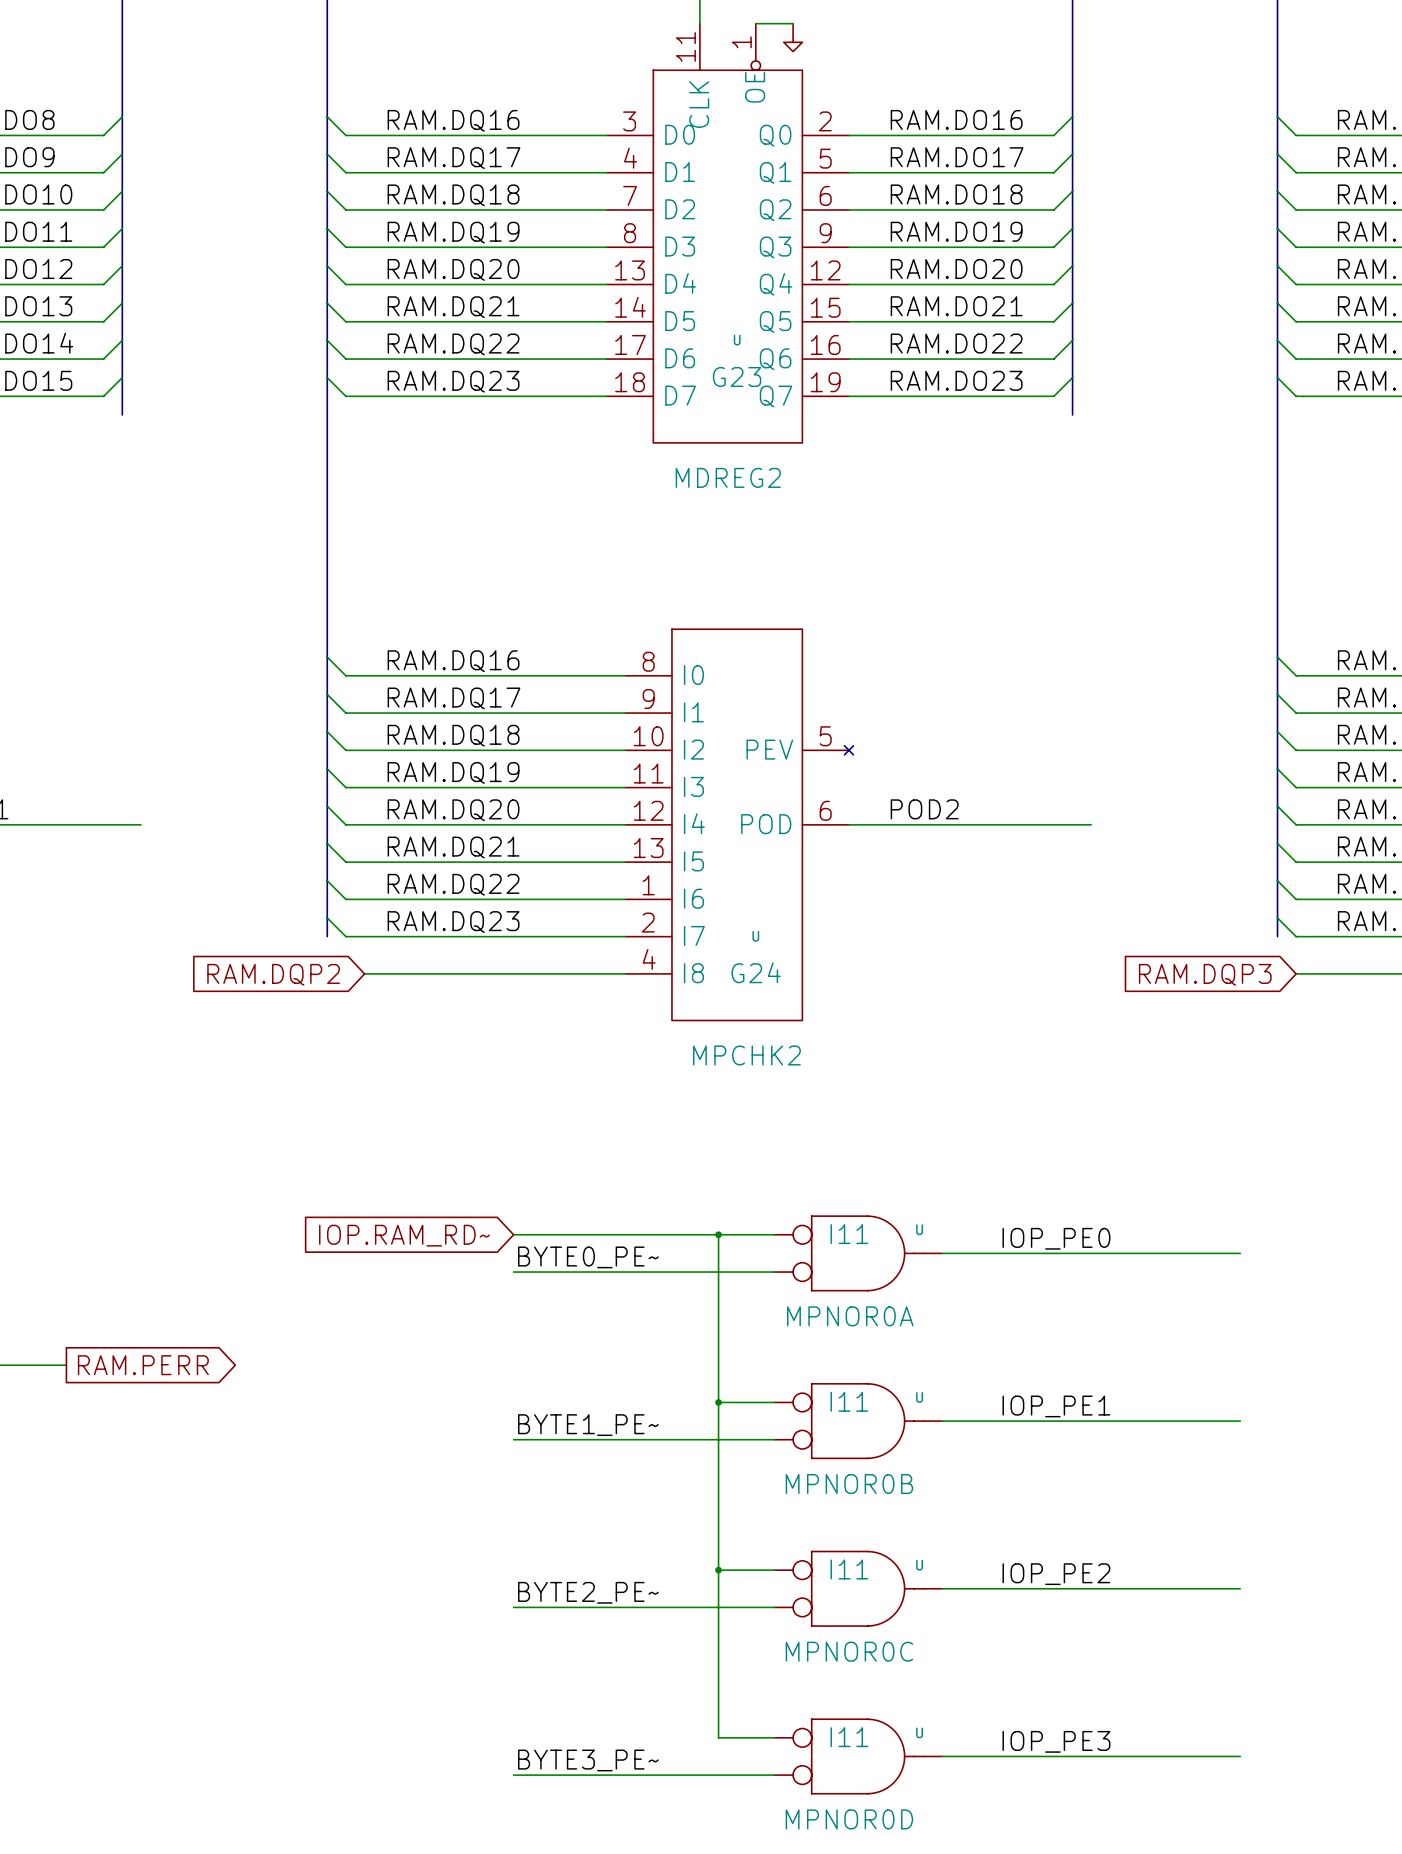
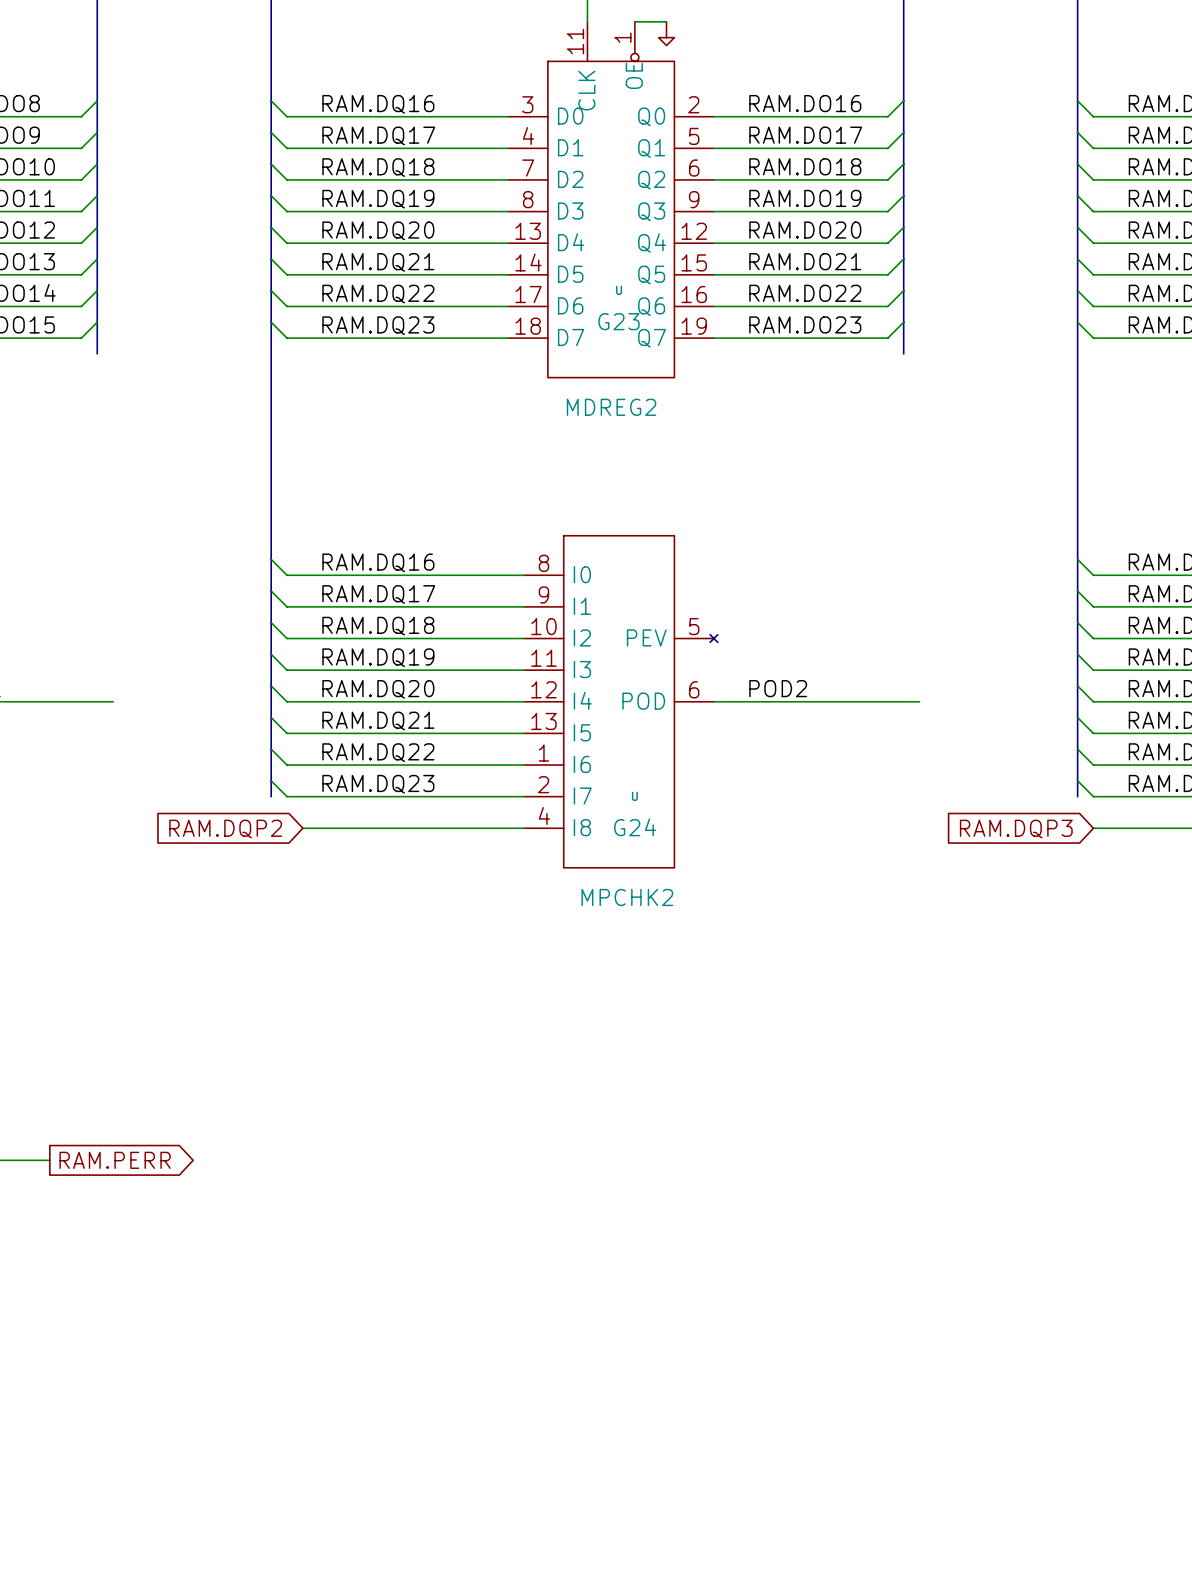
wire: (513, 1234) (774, 1234) -> none
wire: (718, 1234) (718, 1737) (774, 1737) -> none
junction: (718, 1234) -> none
global label: IOP.RAM_RD~ (404, 1235) -> none
label: IOP_PE0 (1056, 1238) -> none
U: (858, 1253) -> none
wire: (942, 1253) (1240, 1253) -> none
label: BYTE0_PE~ (588, 1257) -> none
wire: (513, 1272) (774, 1272) -> none
wire: (718, 1402) (774, 1402) -> none
junction: (718, 1402) -> none
label: IOP_PE1 (1056, 1406) -> none
U: (858, 1421) -> none
wire: (942, 1421) (1240, 1421) -> none
label: BYTE1_PE~ (588, 1425) -> none
wire: (513, 1439) (774, 1439) -> none
wire: (718, 1570) (774, 1570) -> none
junction: (718, 1570) -> none
label: IOP_PE2 (1056, 1574) -> none
U: (858, 1588) -> none
wire: (942, 1588) (1240, 1588) -> none
label: BYTE2_PE~ (588, 1592) -> none
wire: (513, 1607) (774, 1607) -> none
label: IOP_PE3 (1056, 1741) -> none
U: (858, 1756) -> none
wire: (942, 1756) (1240, 1756) -> none
label: BYTE3_PE~ (588, 1760) -> none
wire: (513, 1775) (774, 1775) -> none

